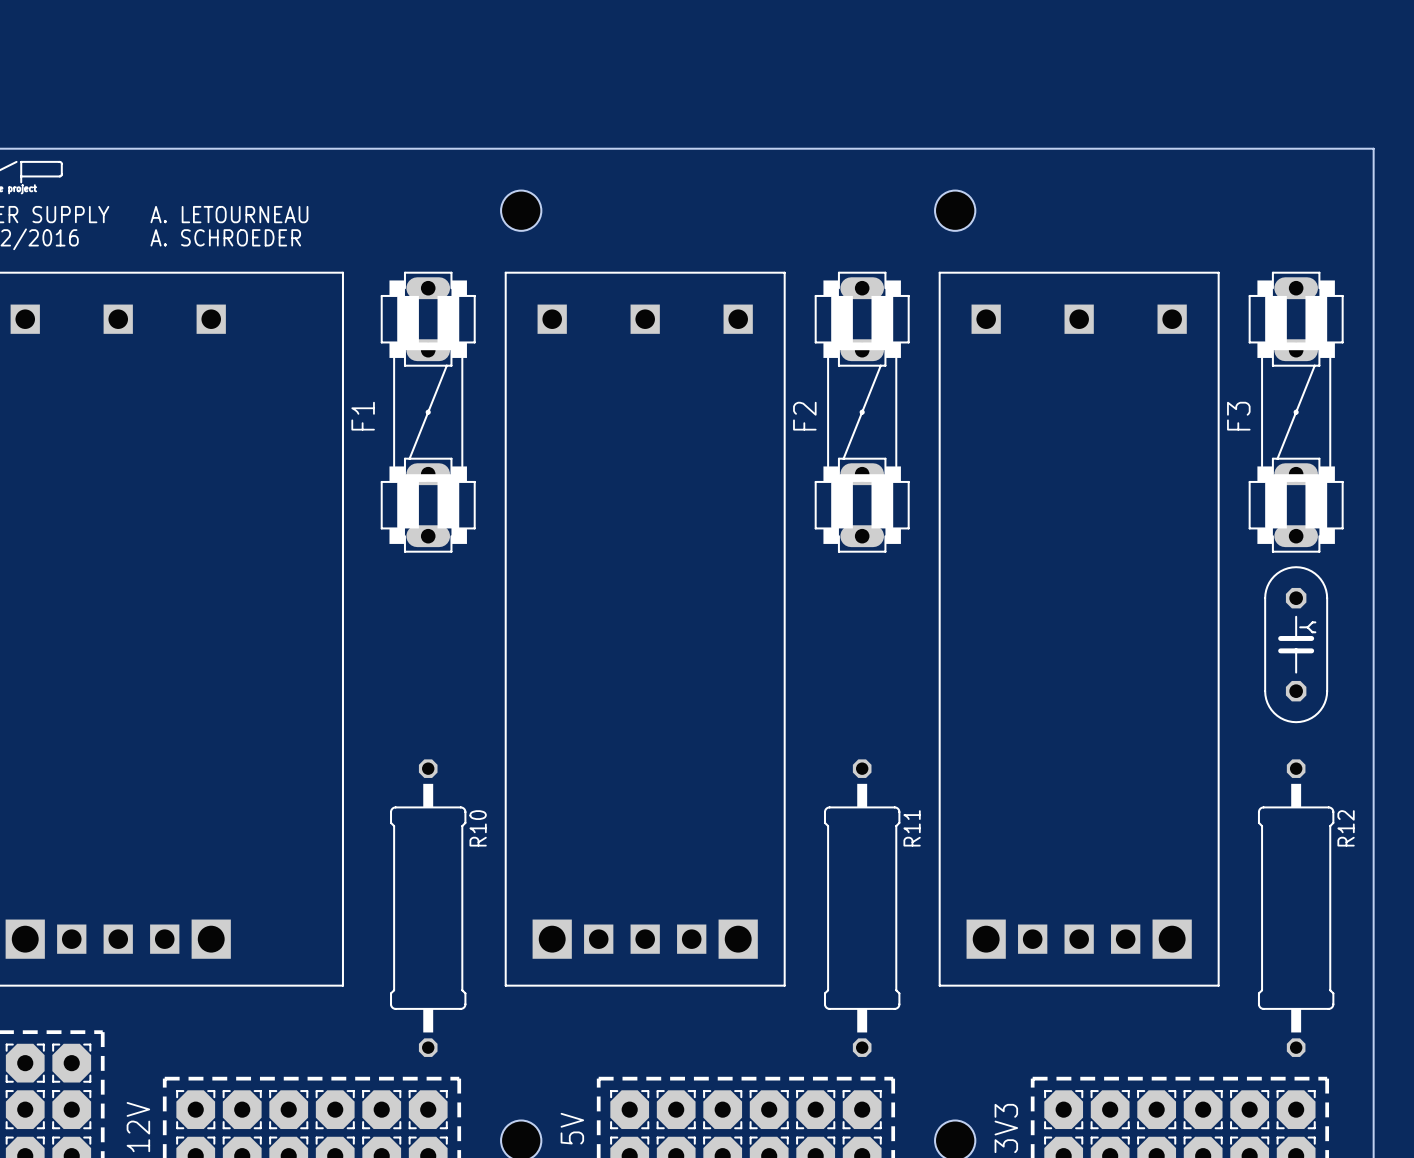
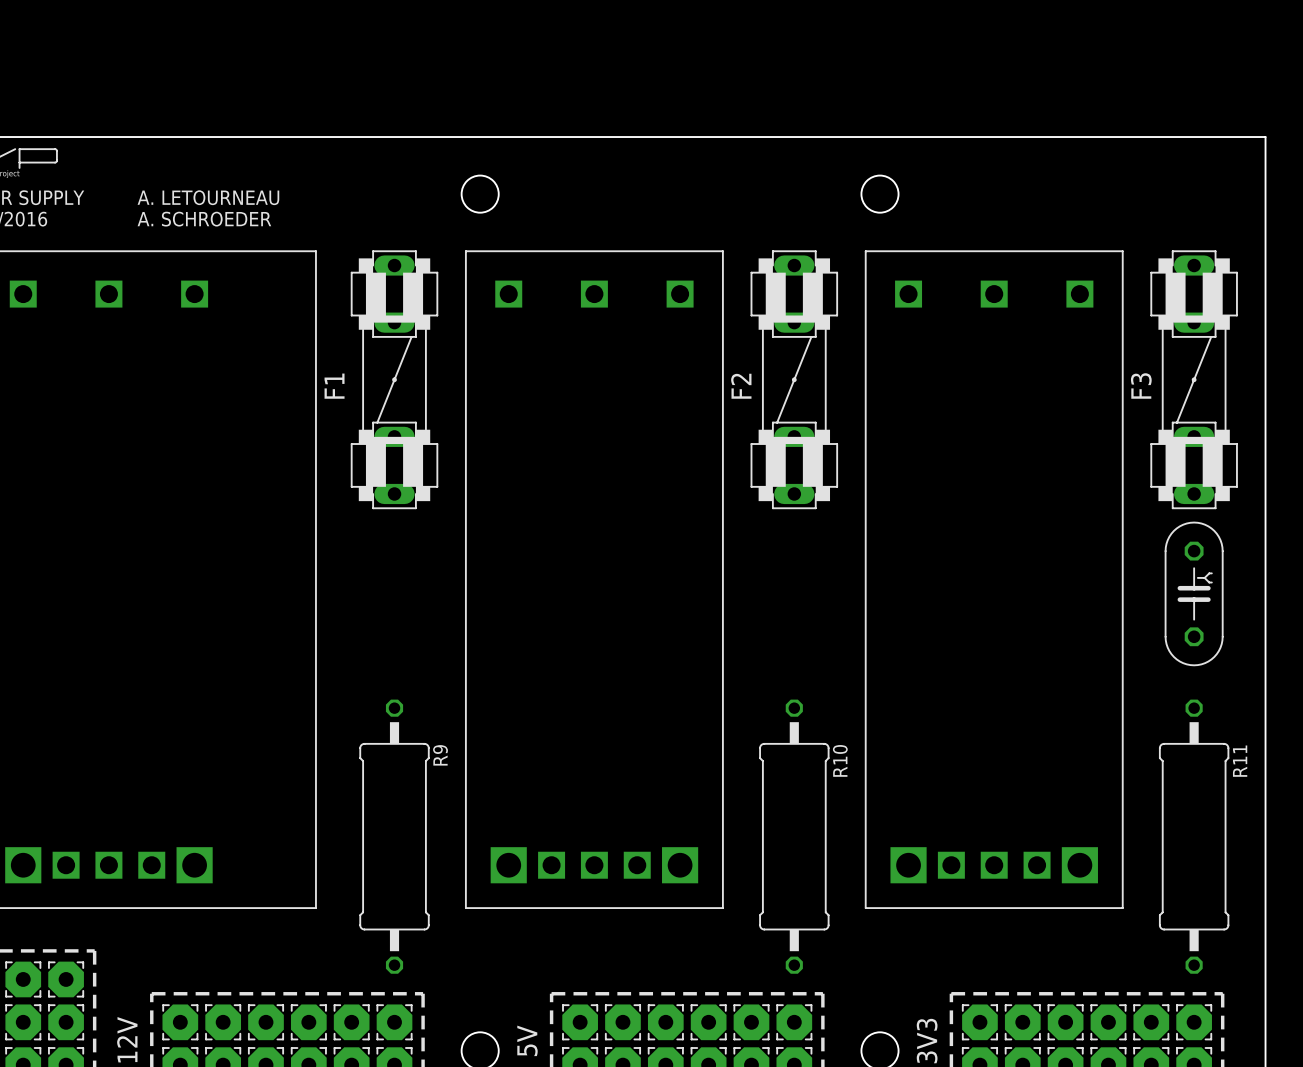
R10 name: R10 (478, 828) -> R9 (440, 755)
R11 name: R11 (912, 828) -> R10 (840, 760)
R12 name: R12 (1346, 828) -> R11 (1240, 761)

